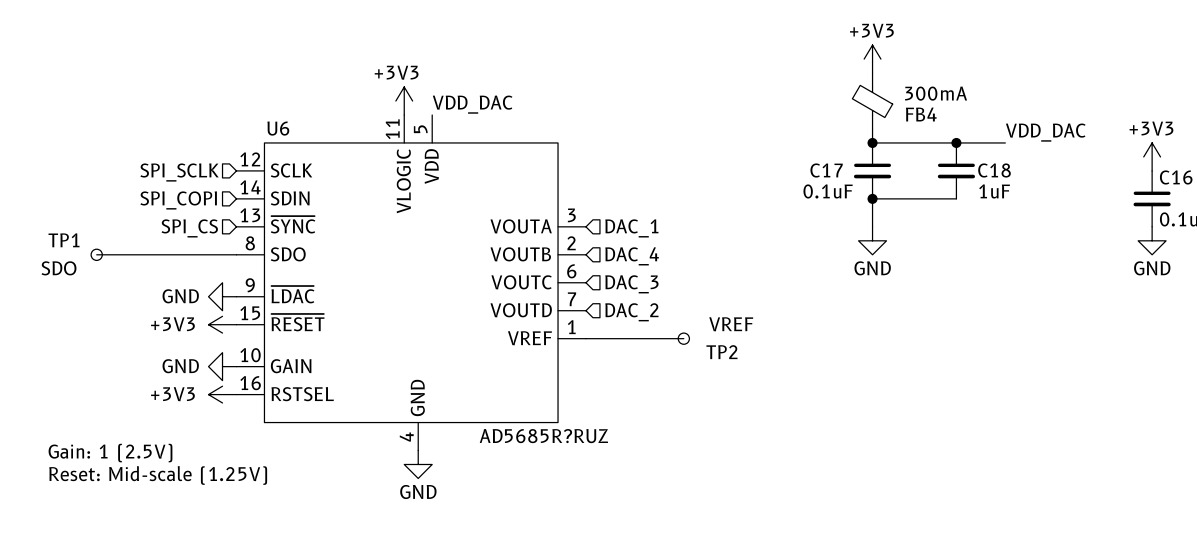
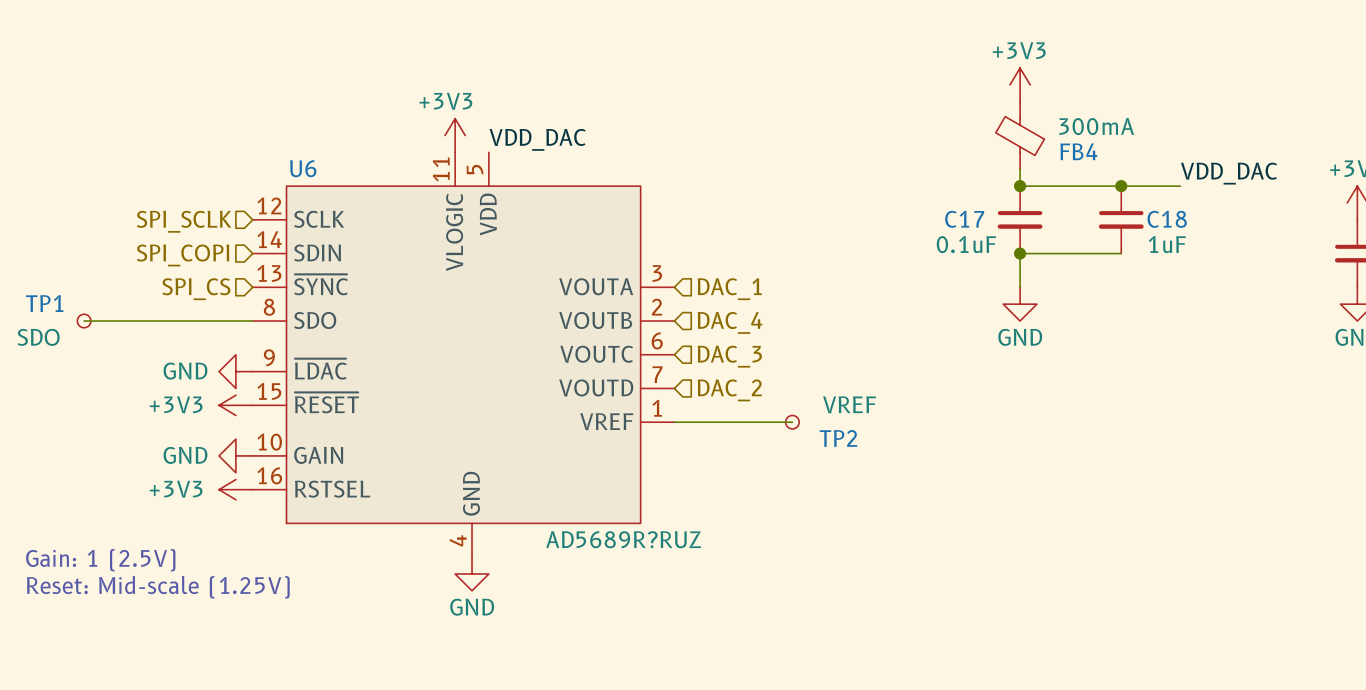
U6 value: AD5685R?RUZ (543, 436) -> AD5689R?RUZ (623, 539)

